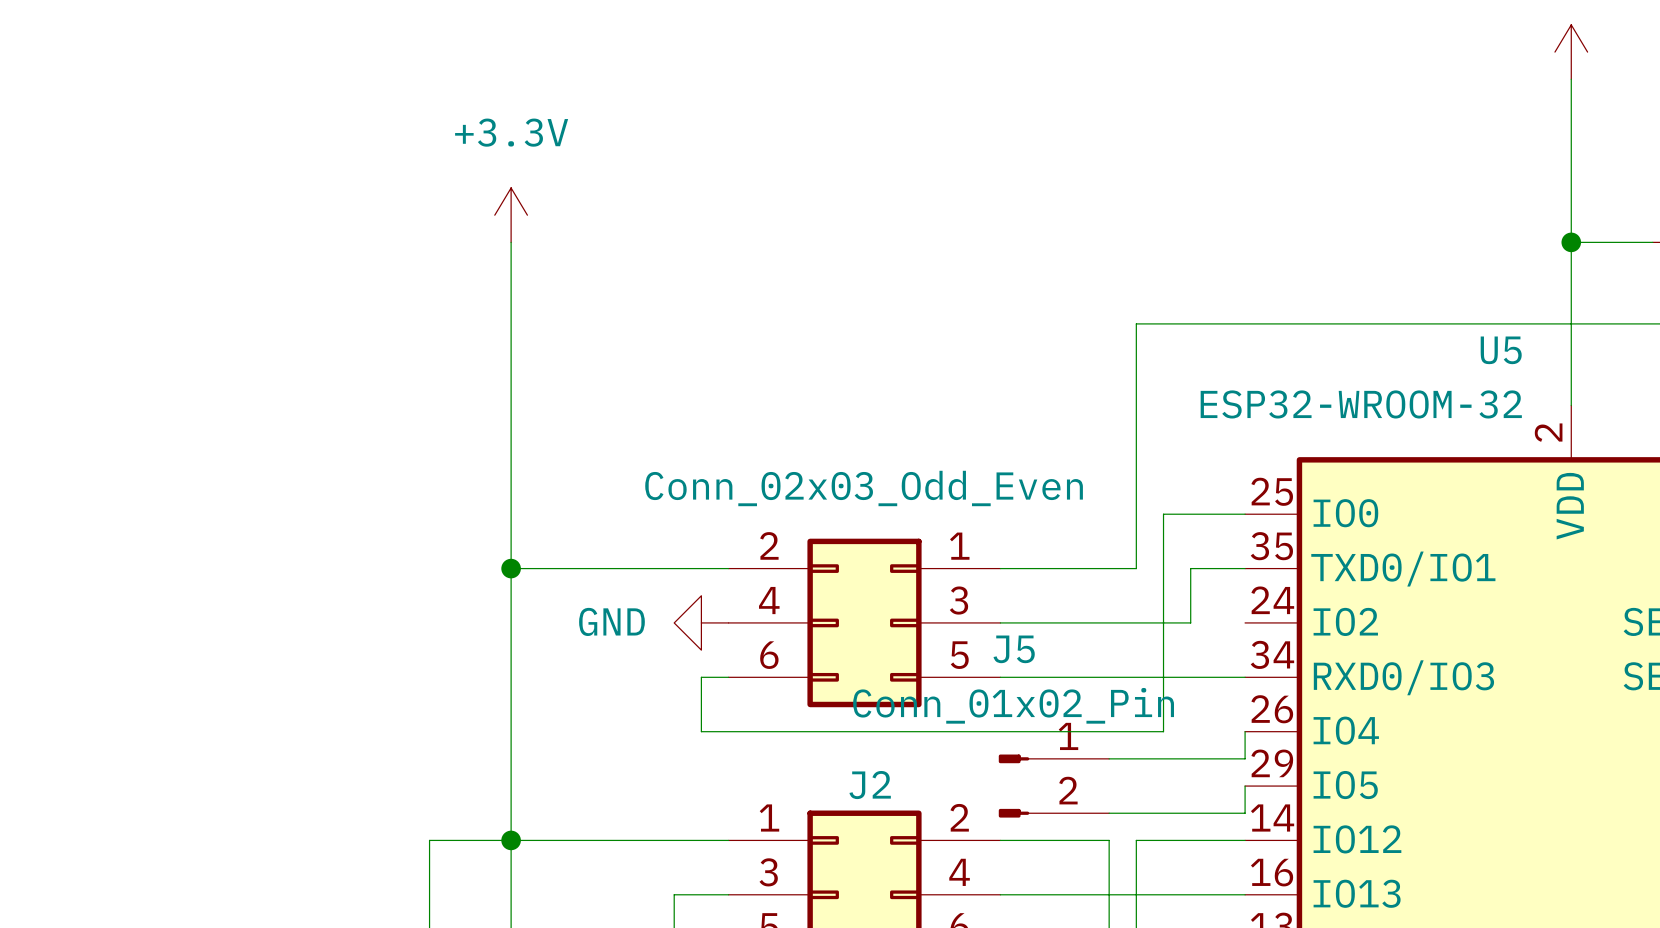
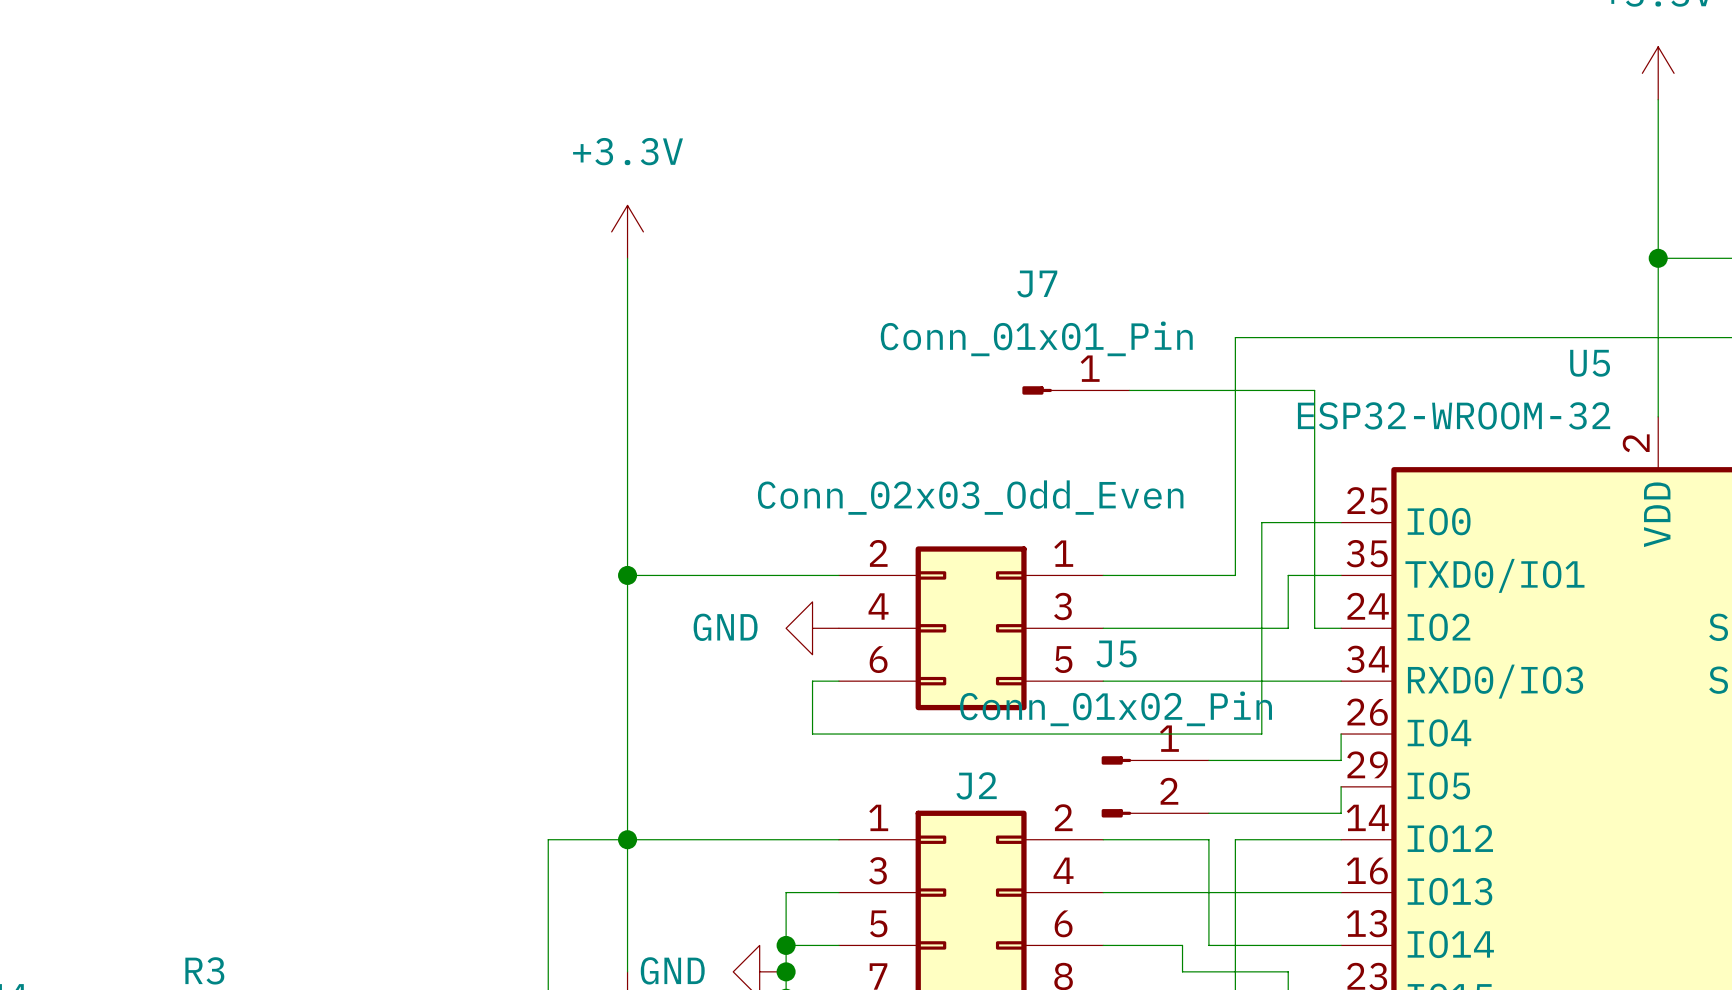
J7: none -> Conn_01x01_Pin (1076, 390)
wire: none -> (1129, 390) (1314, 390) (1314, 628) (1341, 628)

